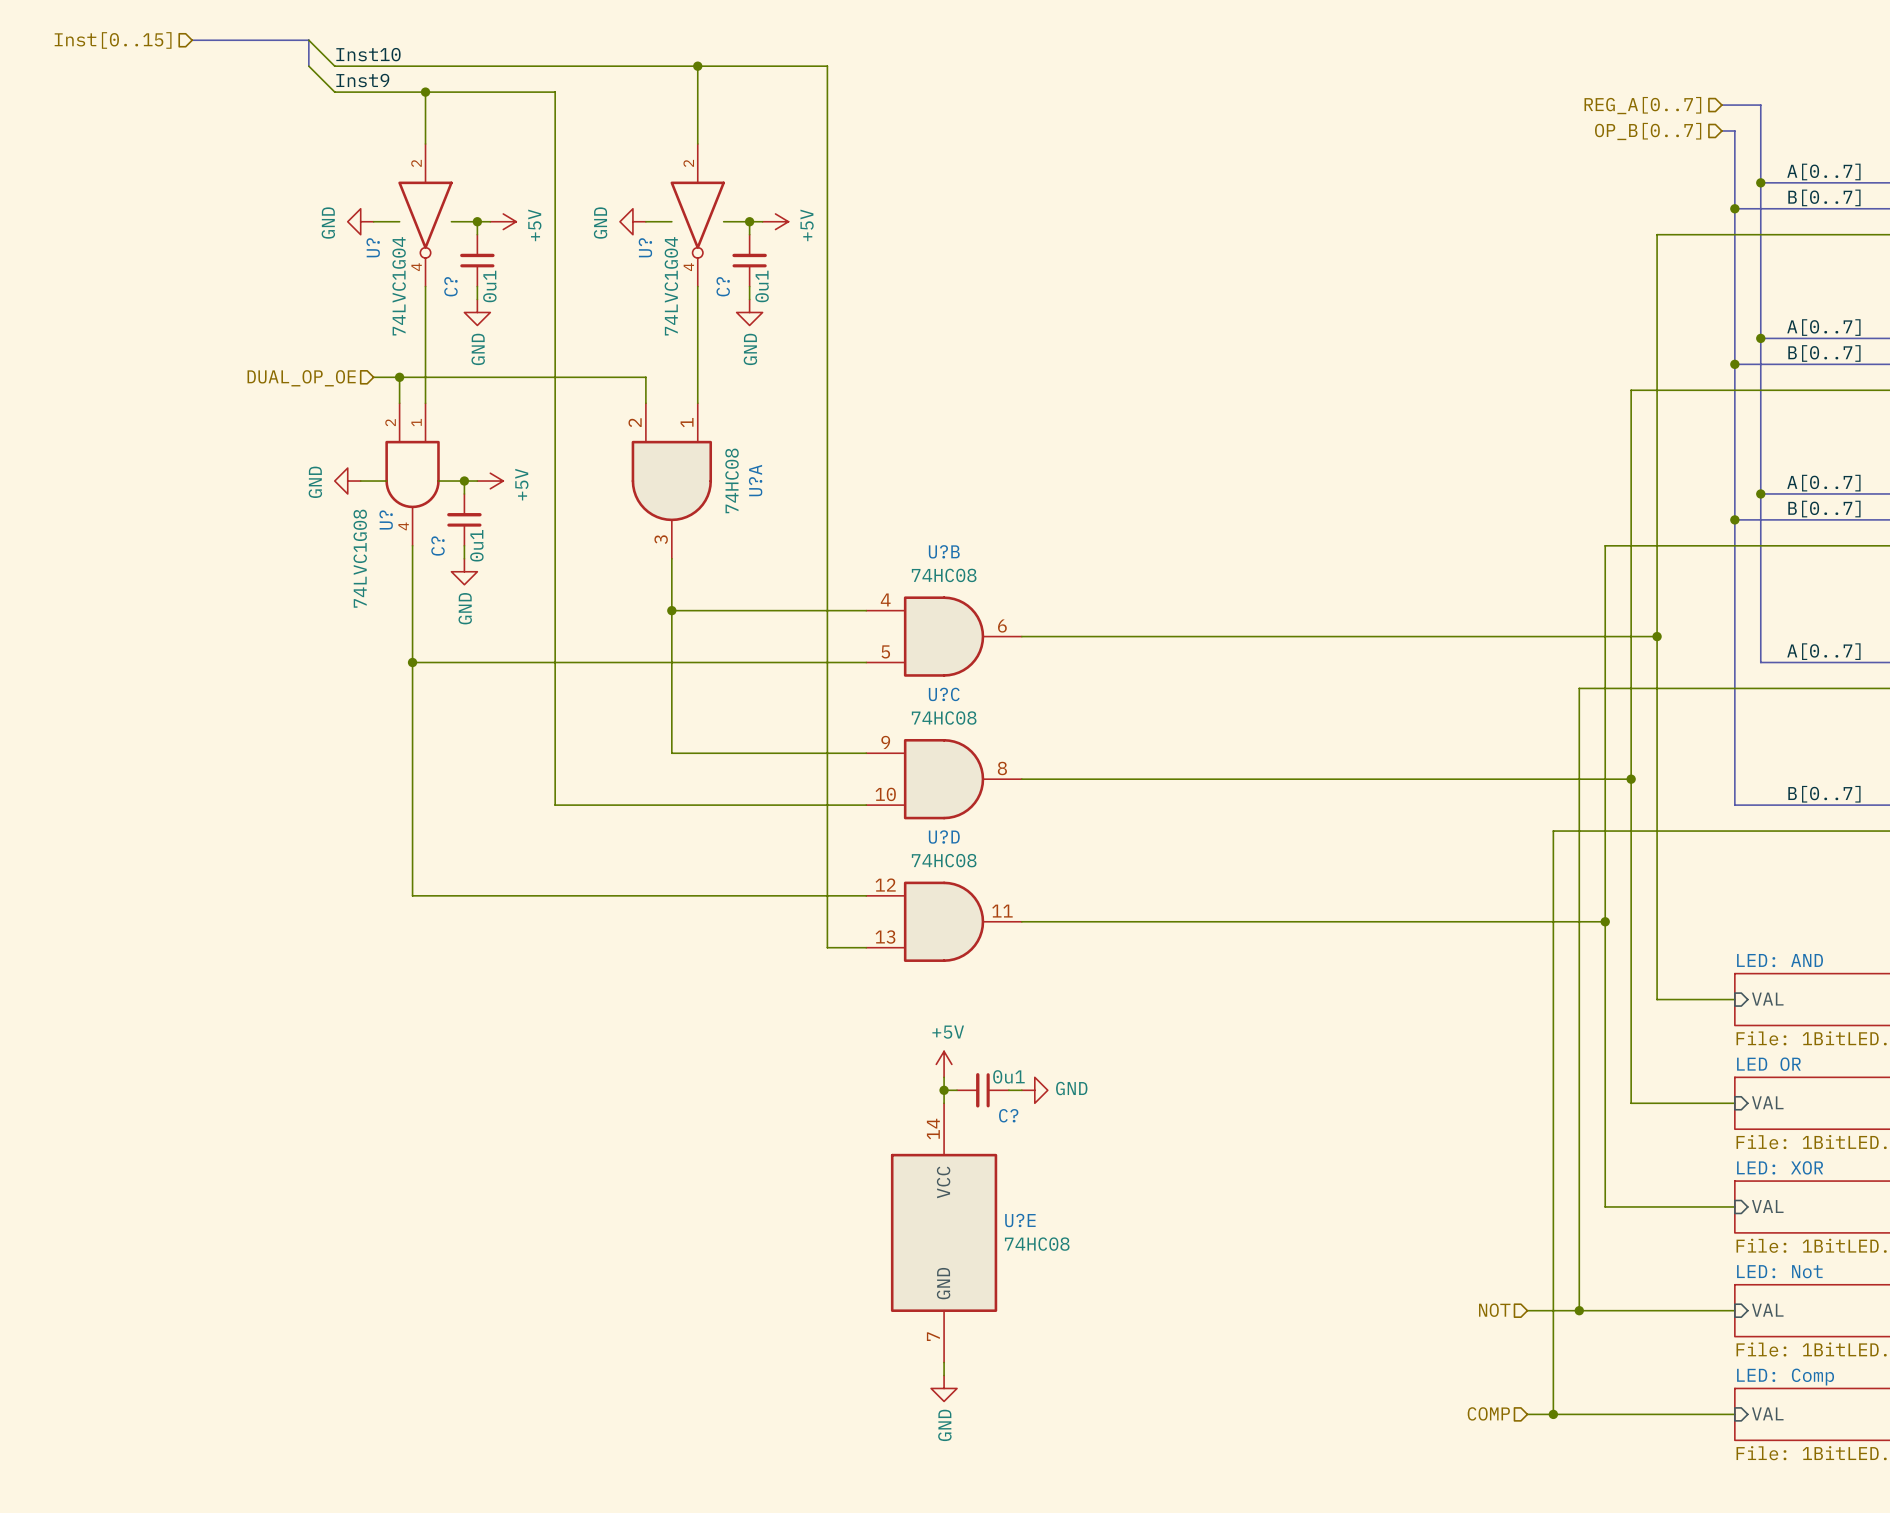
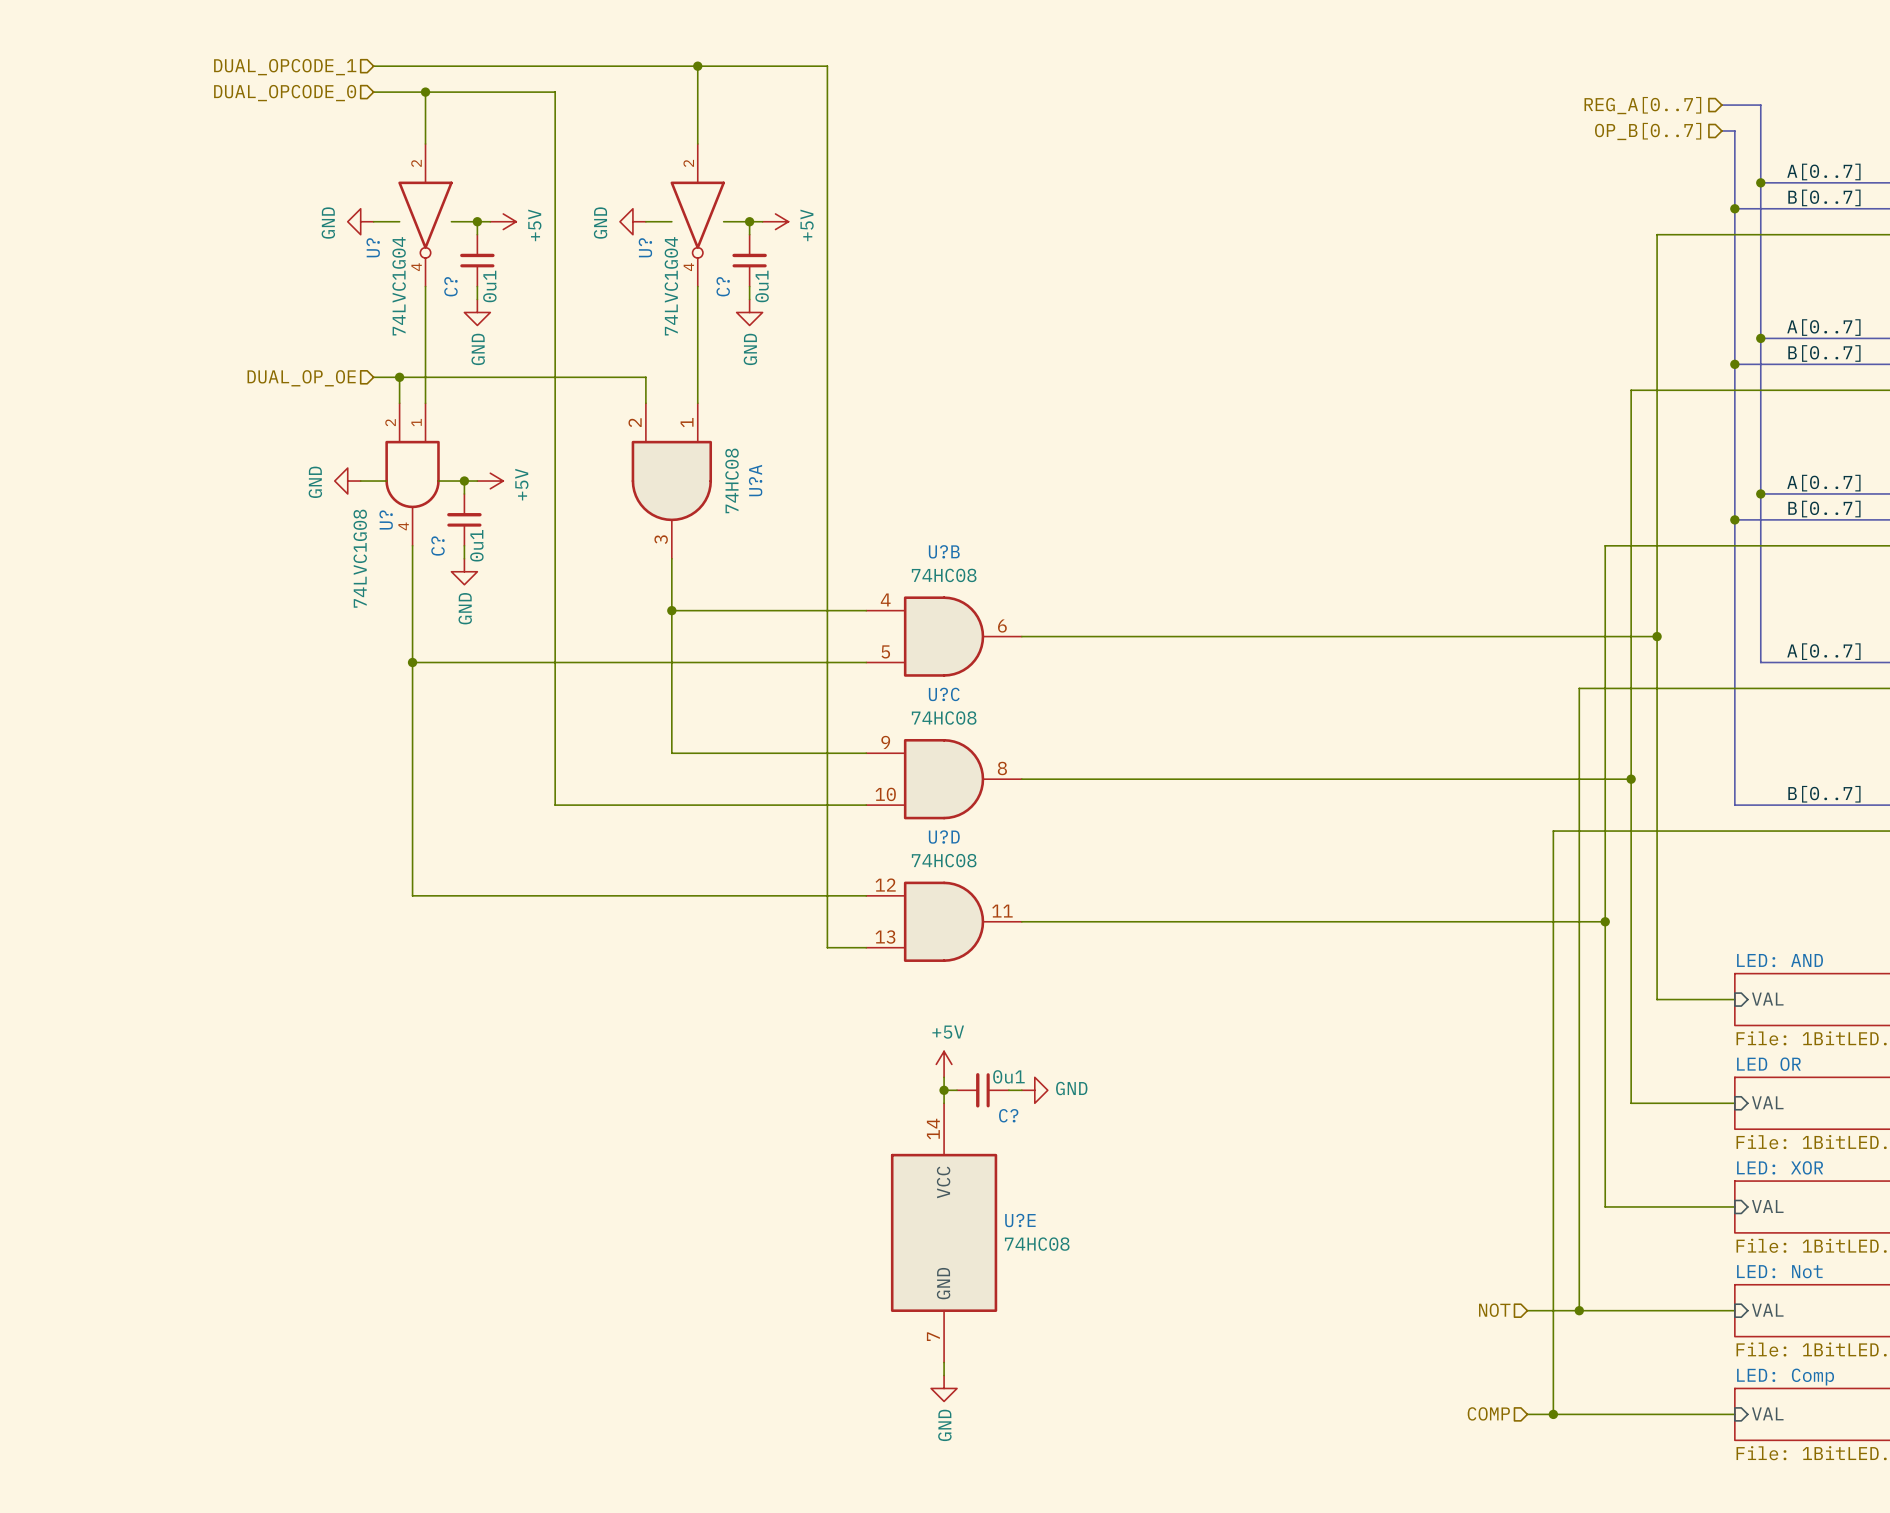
hierarchical label: Inst[0..15] (113, 40) -> none
bus: (192, 40) (308, 40) (308, 66) -> none
wire: (308, 40) (334, 66) (373, 66) -> none
label: Inst10 (368, 54) -> none
wire: (308, 66) (334, 92) (373, 92) -> none
hierarchical label: none -> DUAL_OPCODE_1 (285, 67)
label: Inst9 (362, 80) -> none
hierarchical label: none -> DUAL_OPCODE_0 (285, 93)

